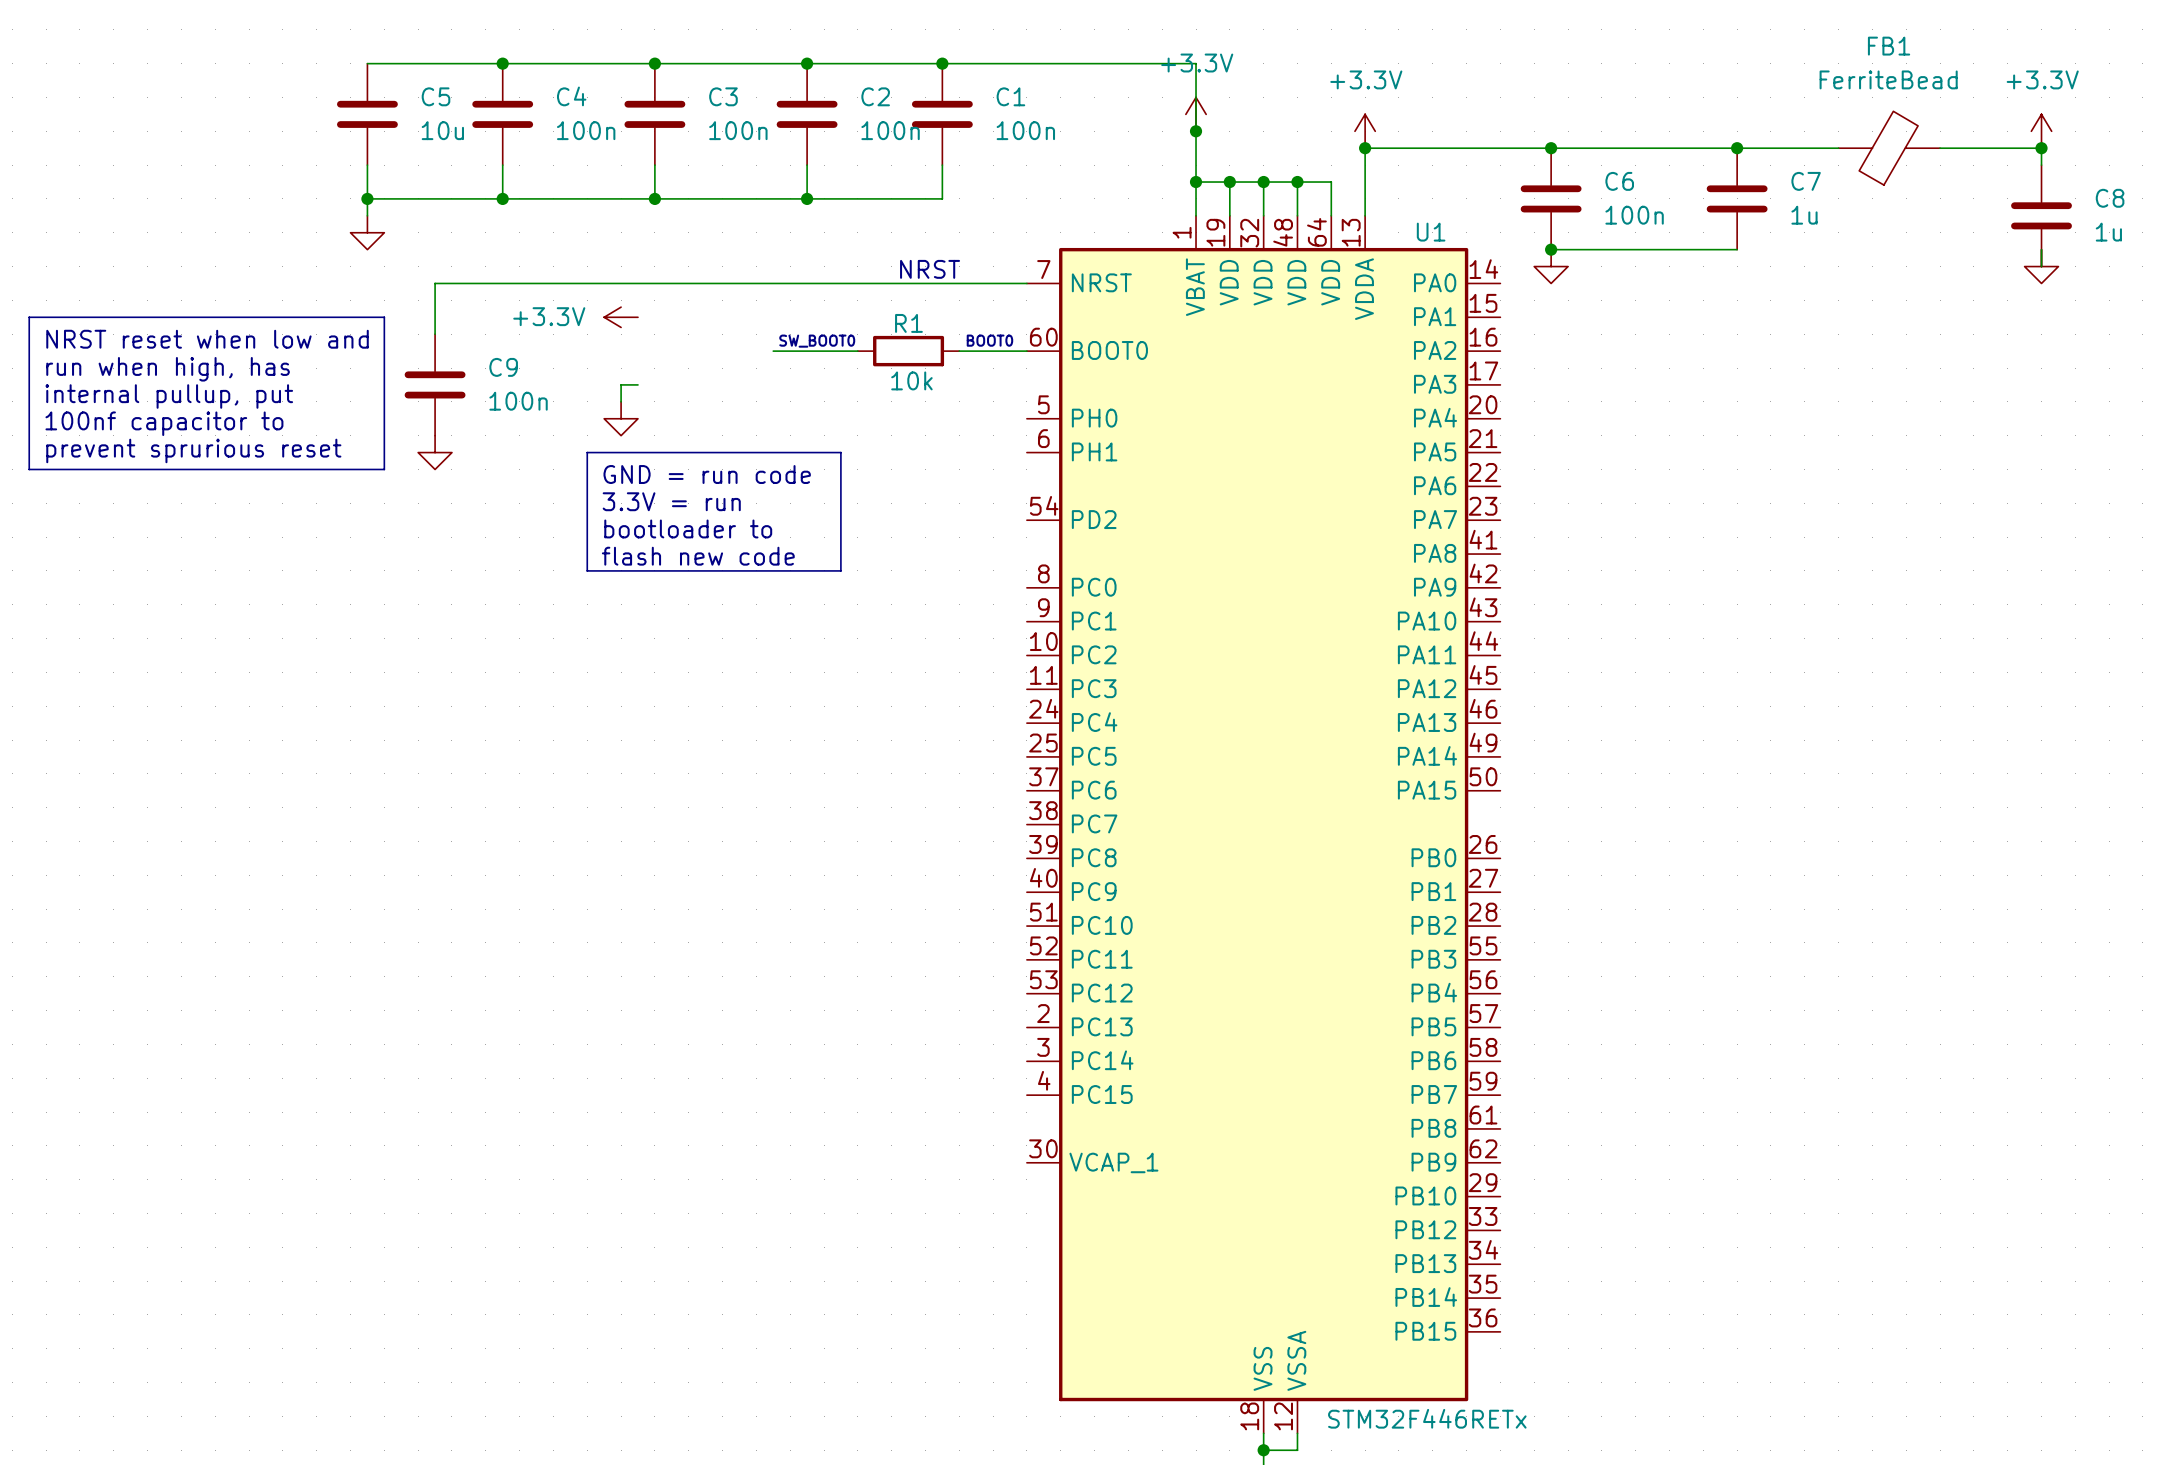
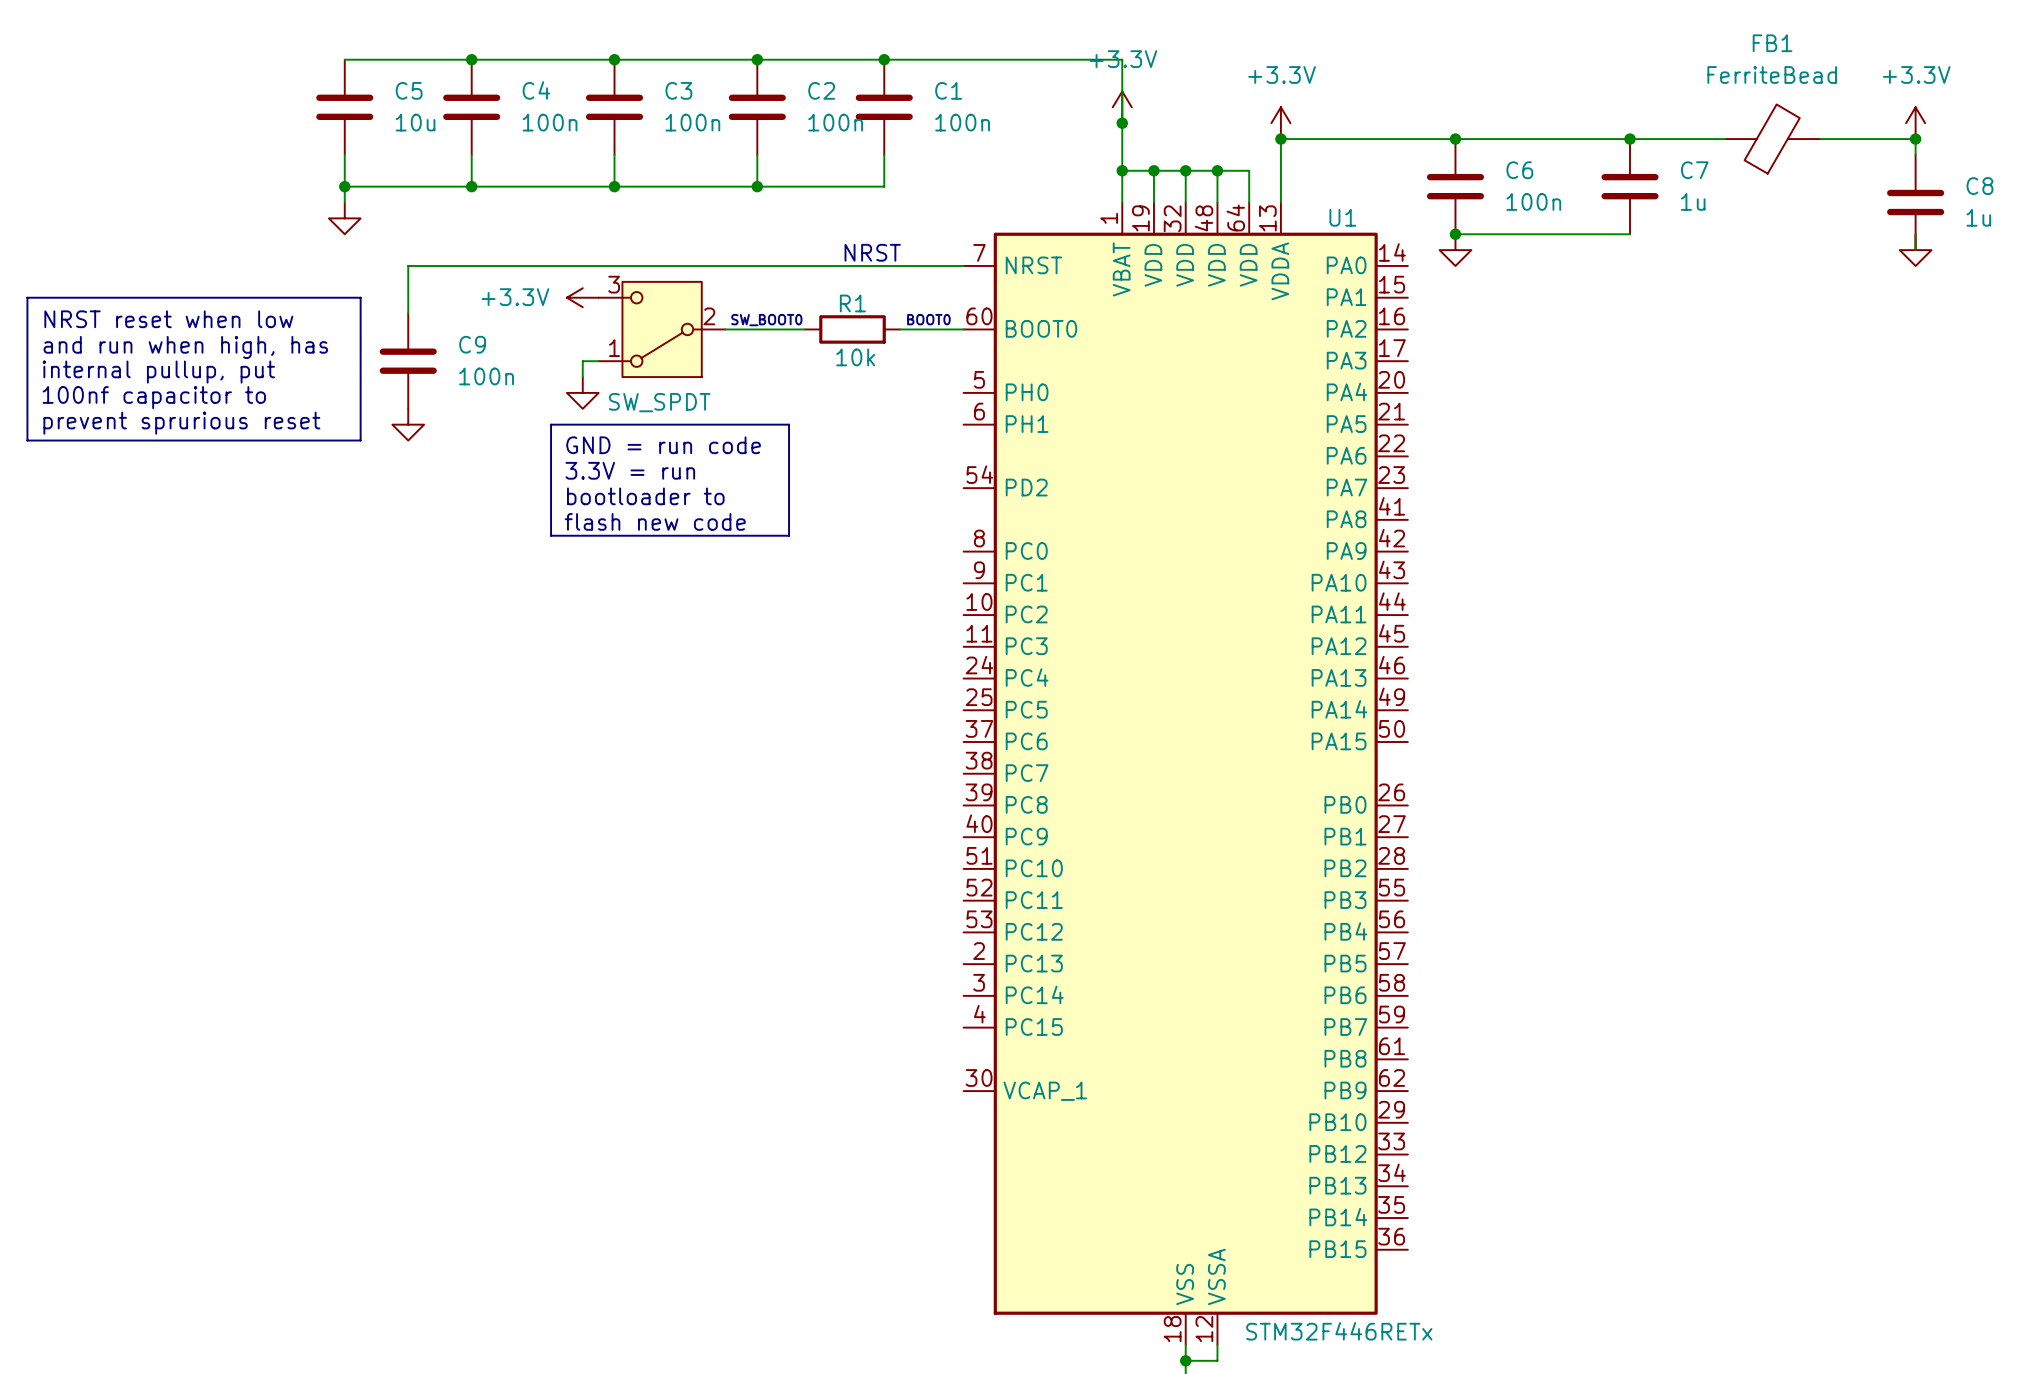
text: NRST reset when low and (207, 339) -> NRST reset when low (168, 319)
part: none -> SW_SPDT (662, 329)
text: run when high, has (168, 369) -> and run when high, has (185, 347)

